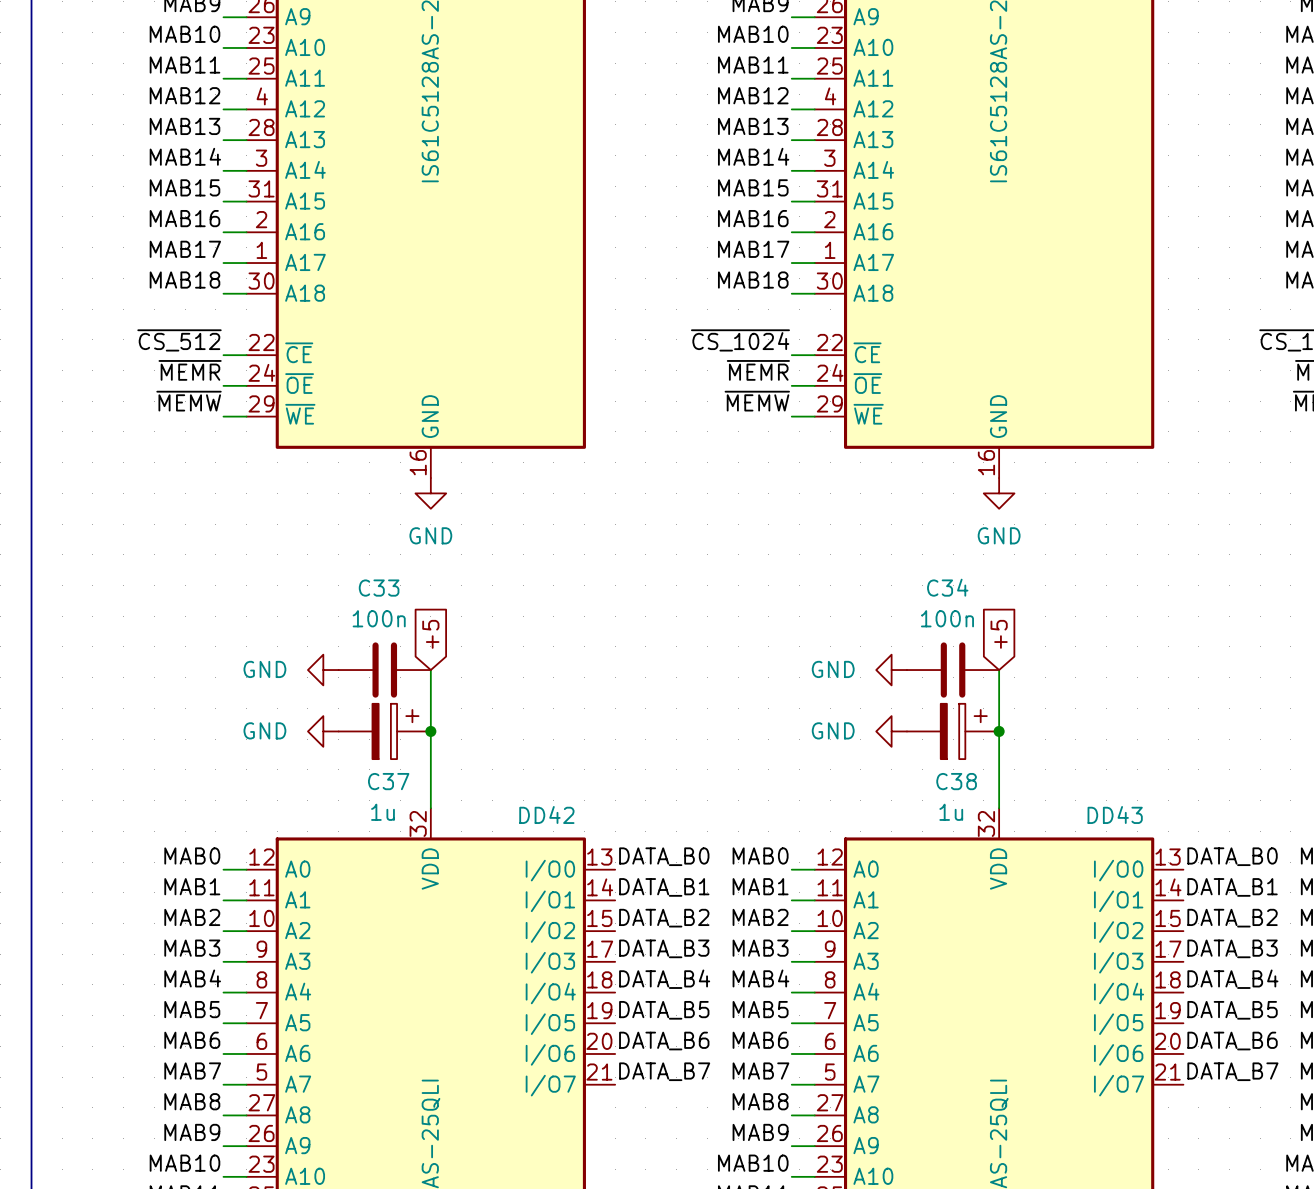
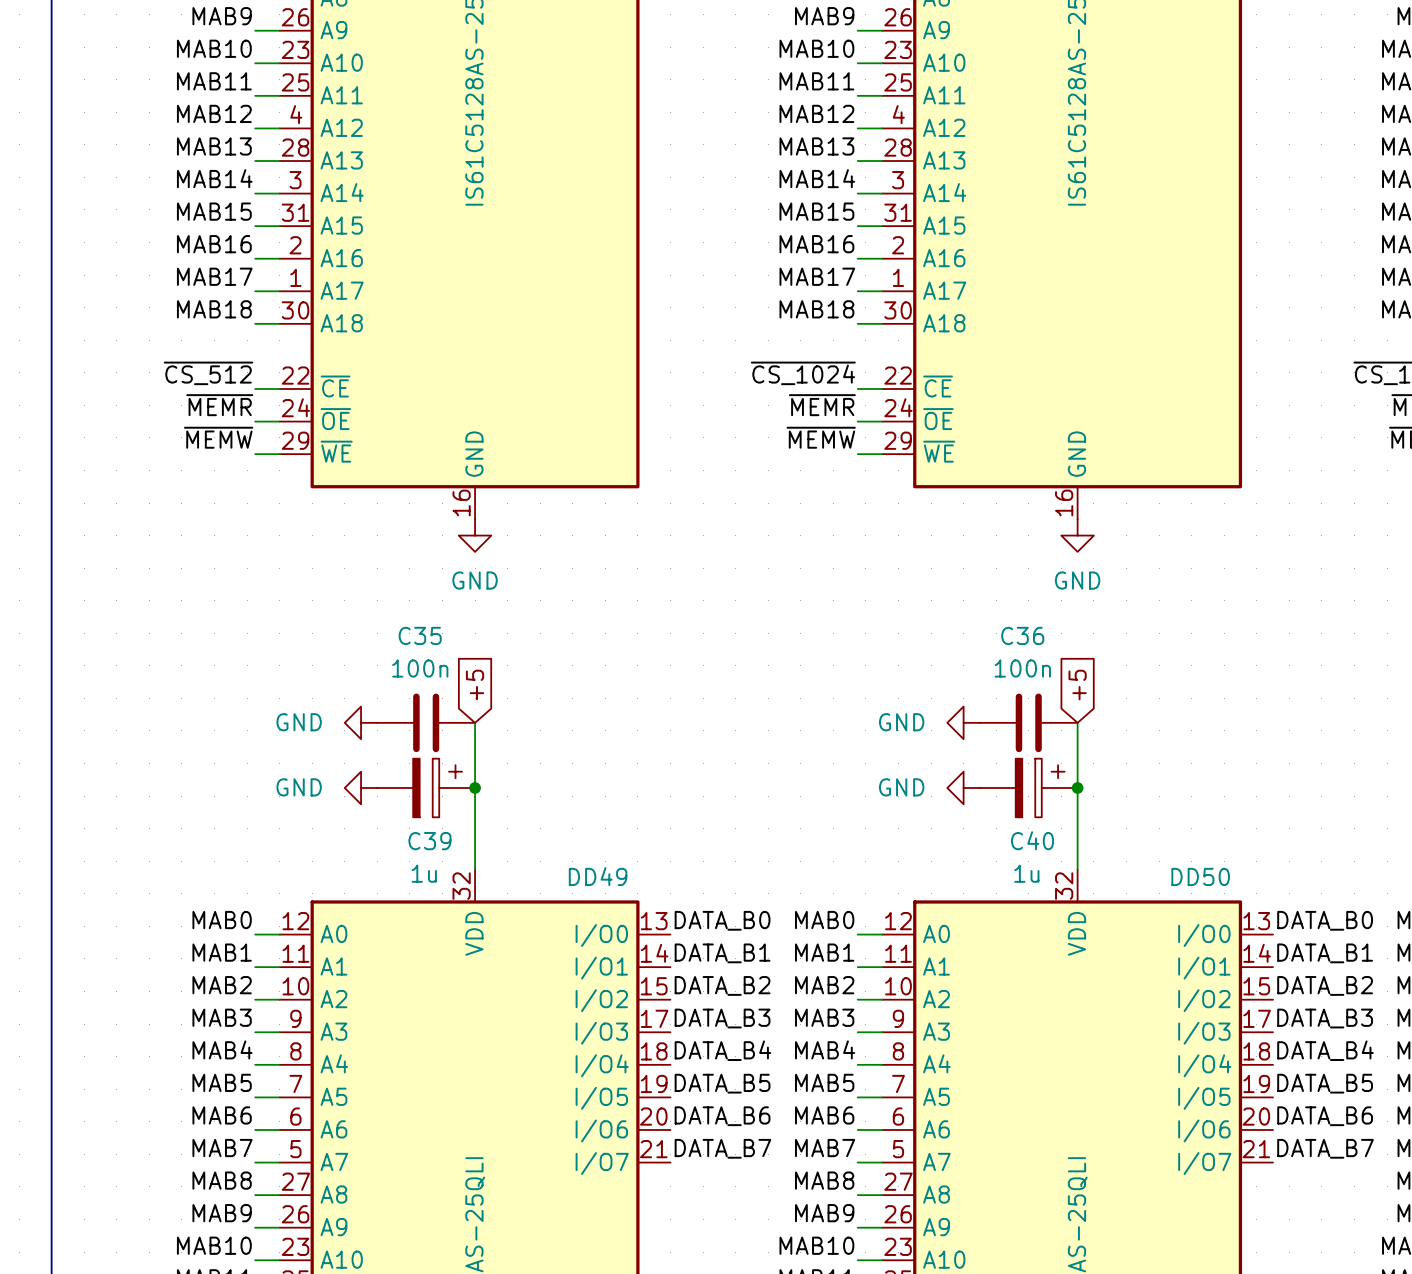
C34 name: C34 (947, 587) -> C36 (1022, 635)
C33 name: C33 (379, 588) -> C35 (420, 635)
C37 name: C37 (388, 781) -> C39 (429, 841)
C38 name: C38 (956, 781) -> C40 (1032, 840)
DD42 name: DD42 (546, 814) -> DD49 (598, 876)
DD43 name: DD43 (1115, 814) -> DD50 (1200, 876)

